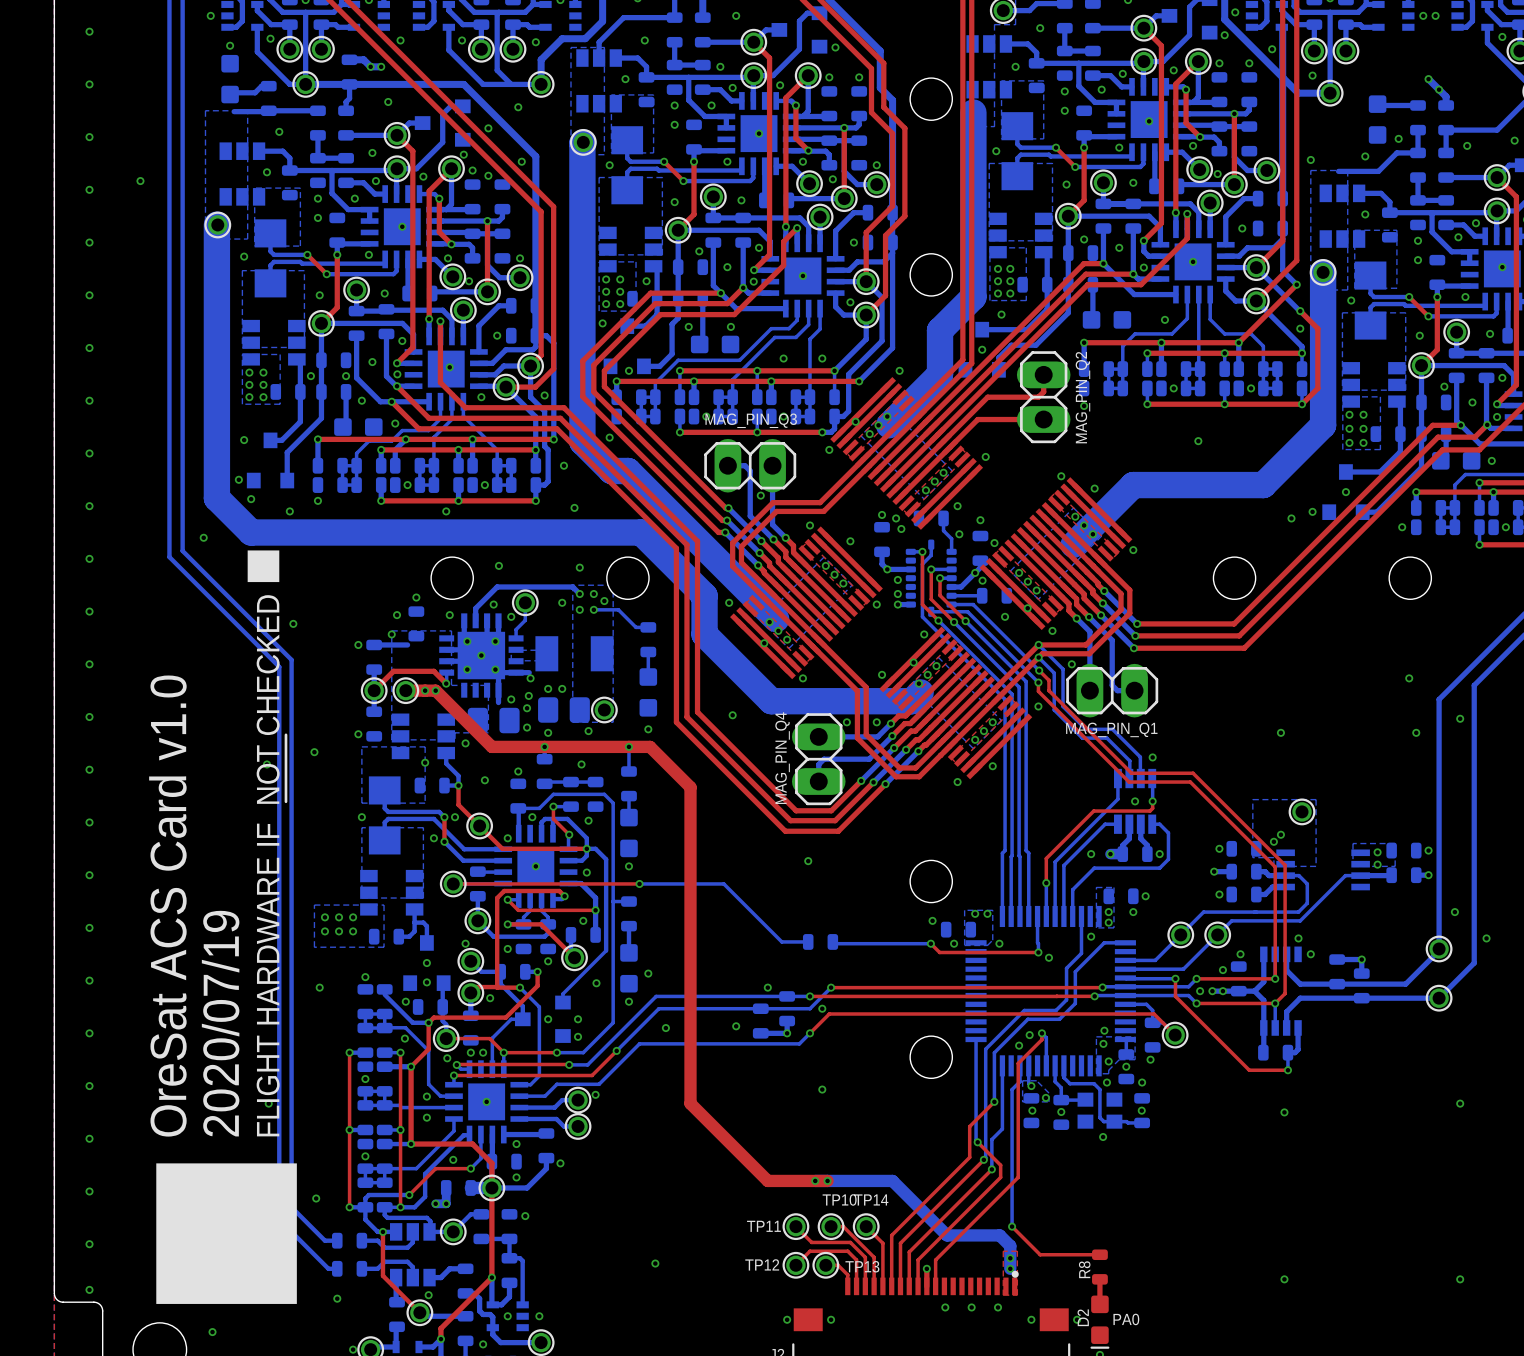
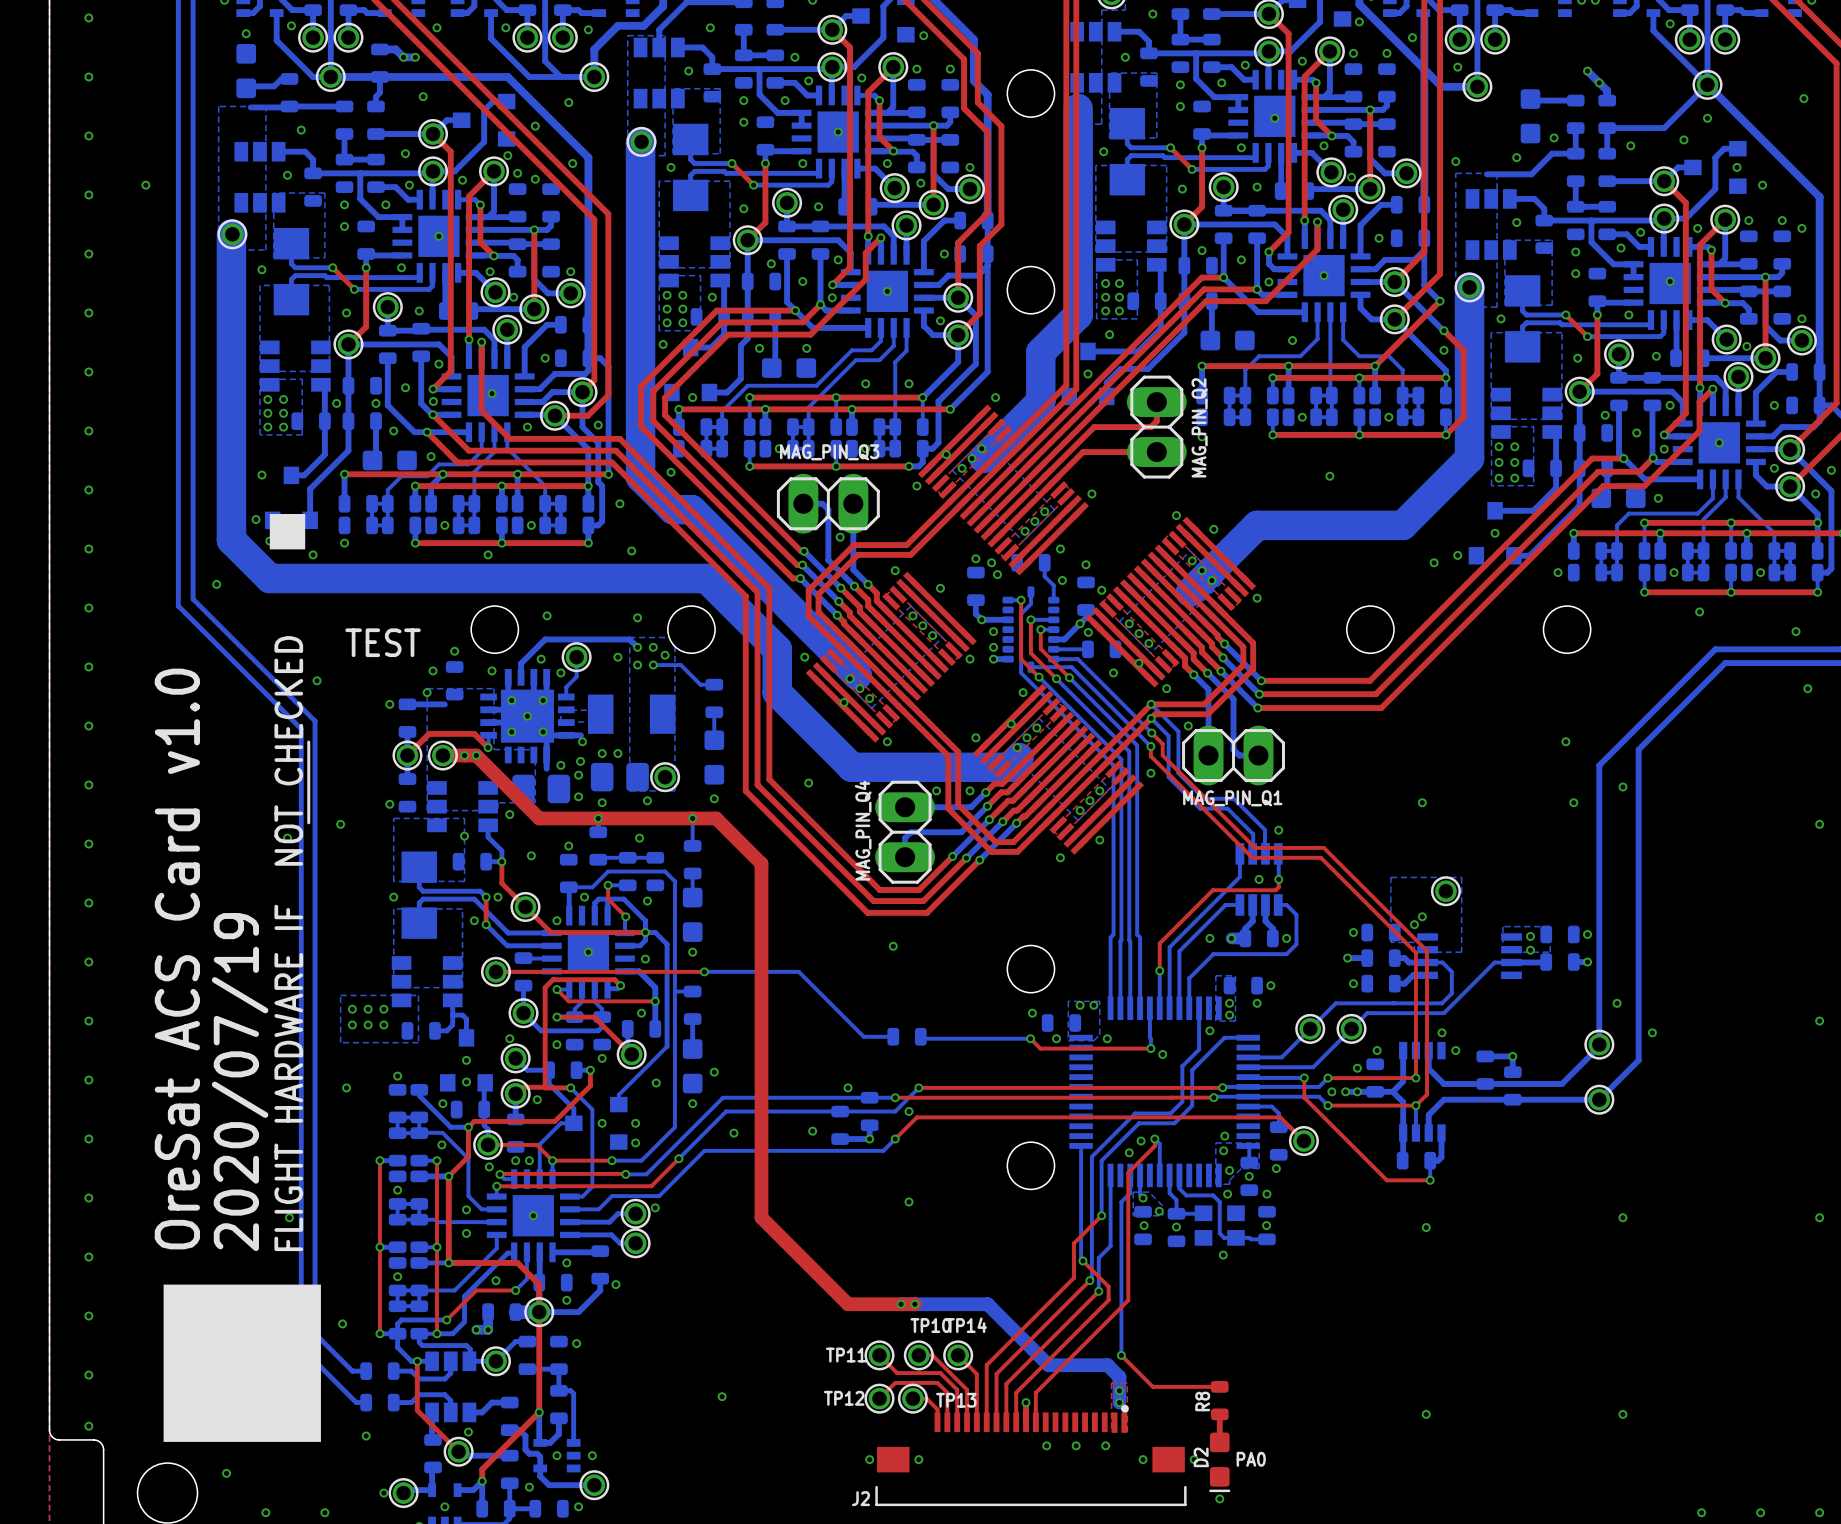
drawing: none -> [269, 514, 311, 825]
drawing: [247, 550, 288, 804] -> none
text: none -> TEST (383, 642)

